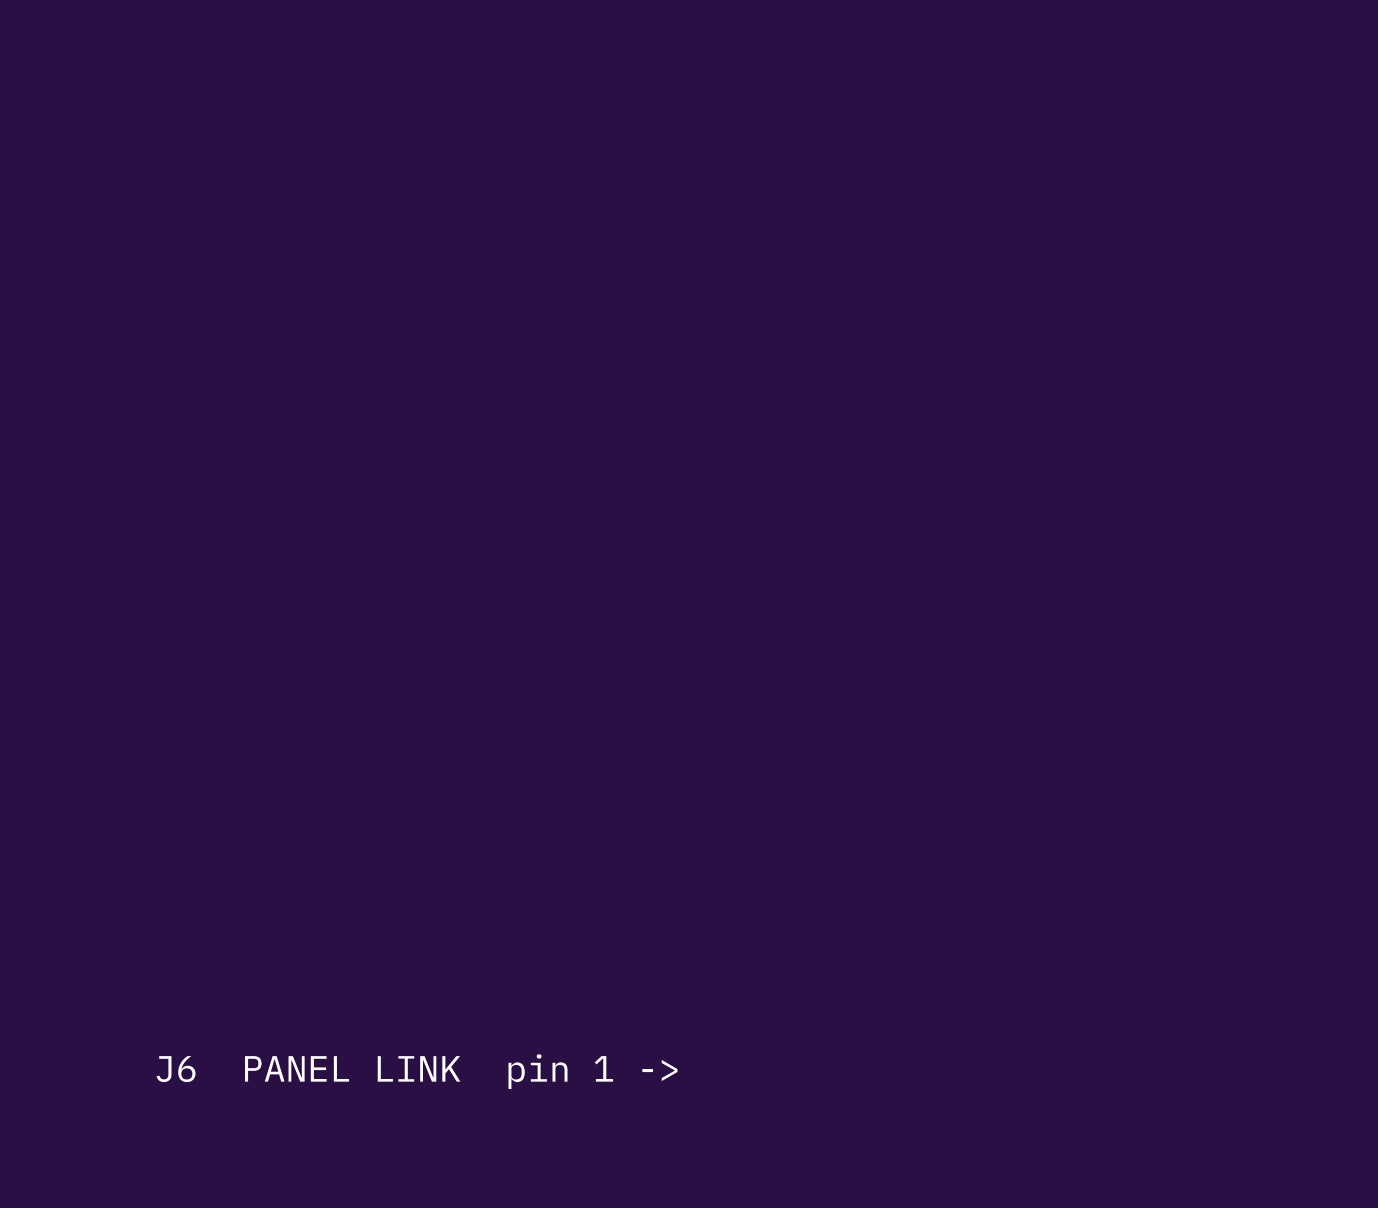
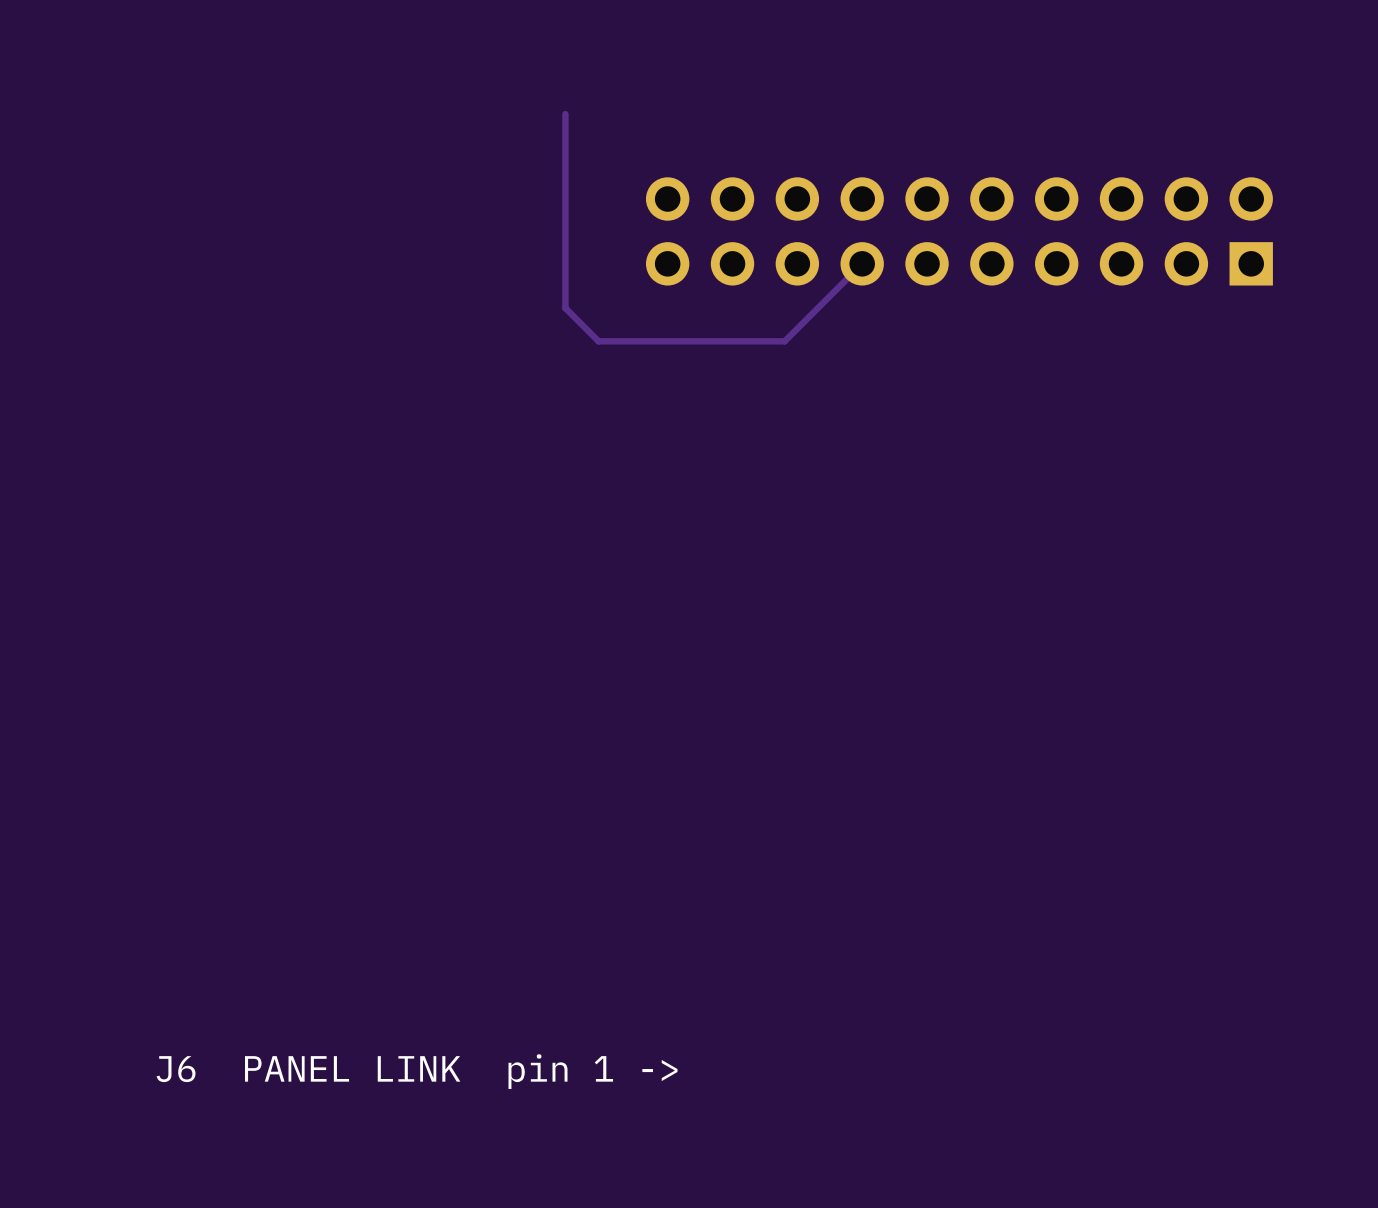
track: none -> (565, 114) (565, 308) (598, 341) (784, 341) (862, 263)
part: none -> (959, 231)

